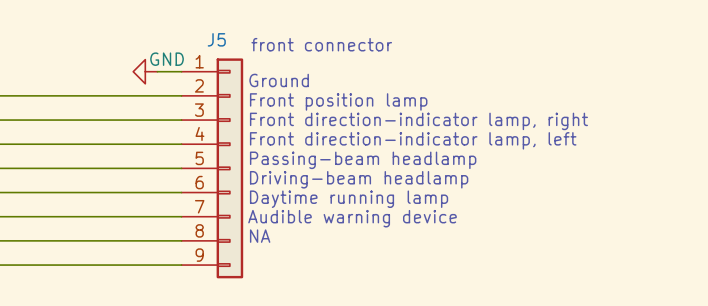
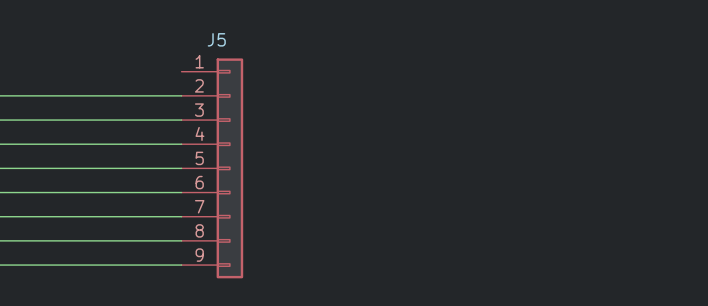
text: front connector (321, 44) -> none
power symbol: GND (145, 71) -> none
wire: (157, 71) (181, 71) -> none
text: Ground (279, 80) -> none
text: Front position lamp (338, 101) -> none
text: Front direction-indicator lamp, right (418, 121) -> none
text: Front direction-indicator lamp, left (413, 140) -> none
text: Passing-beam headlamp (363, 160) -> none
text: Driving-beam headlamp (359, 179) -> none
text: Daytime running lamp (349, 199) -> none
text: Audible warning device (352, 218) -> none
text: NA (260, 236) -> none

